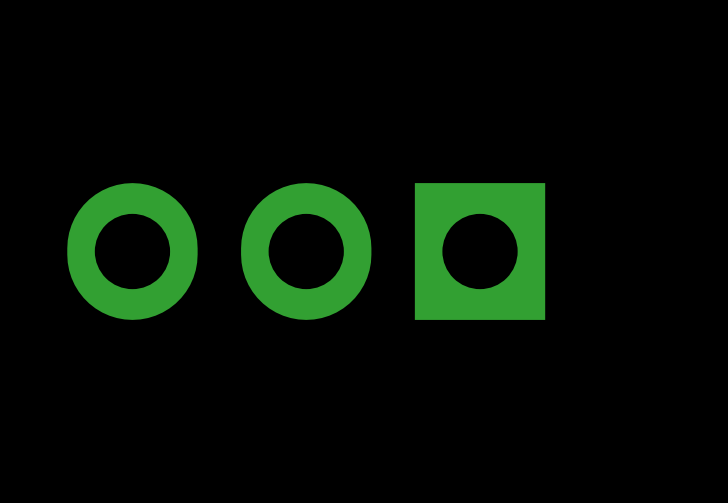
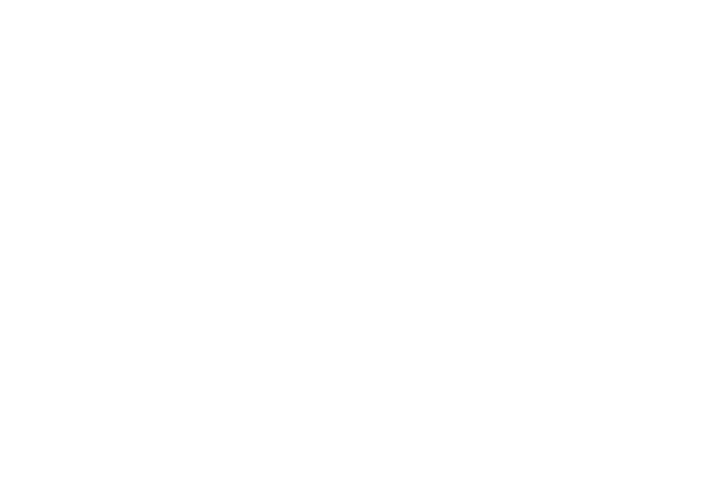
part: (306, 251) -> none

